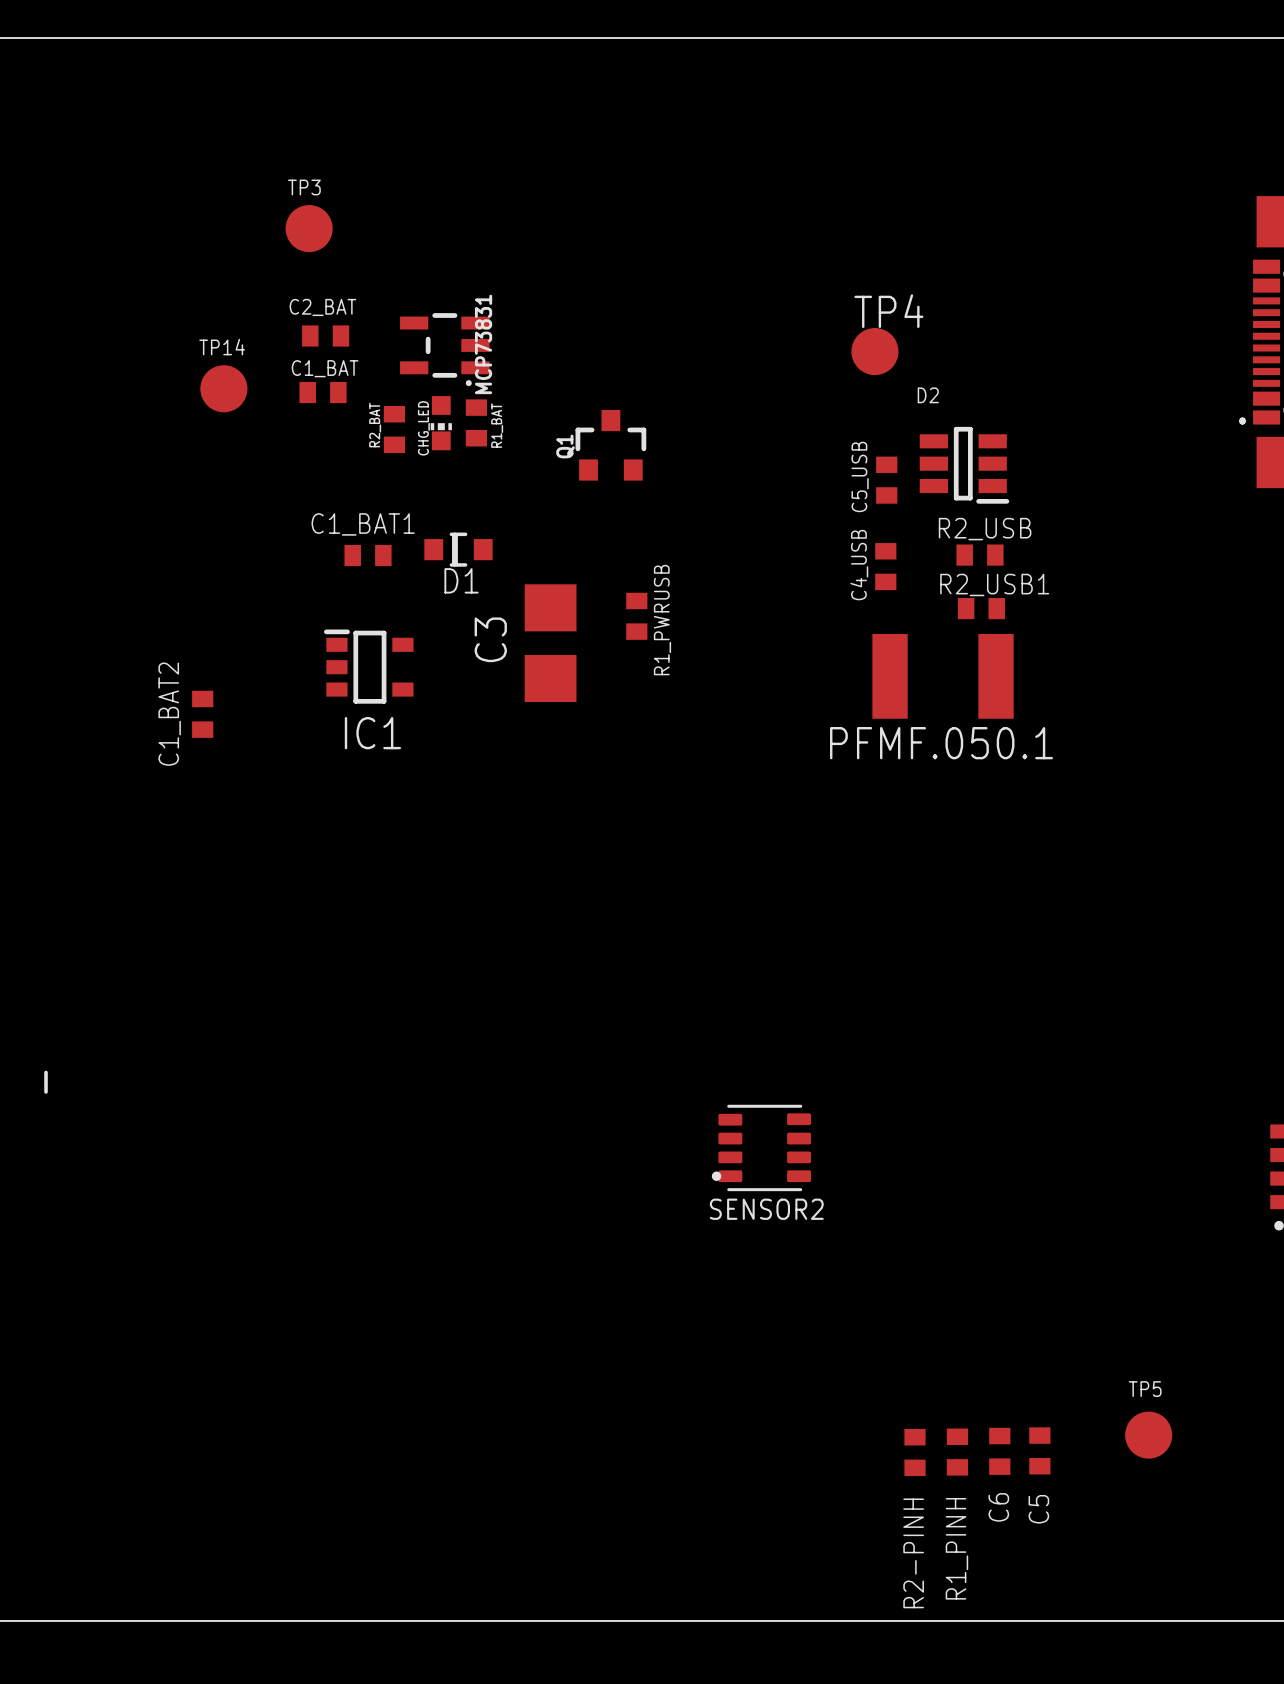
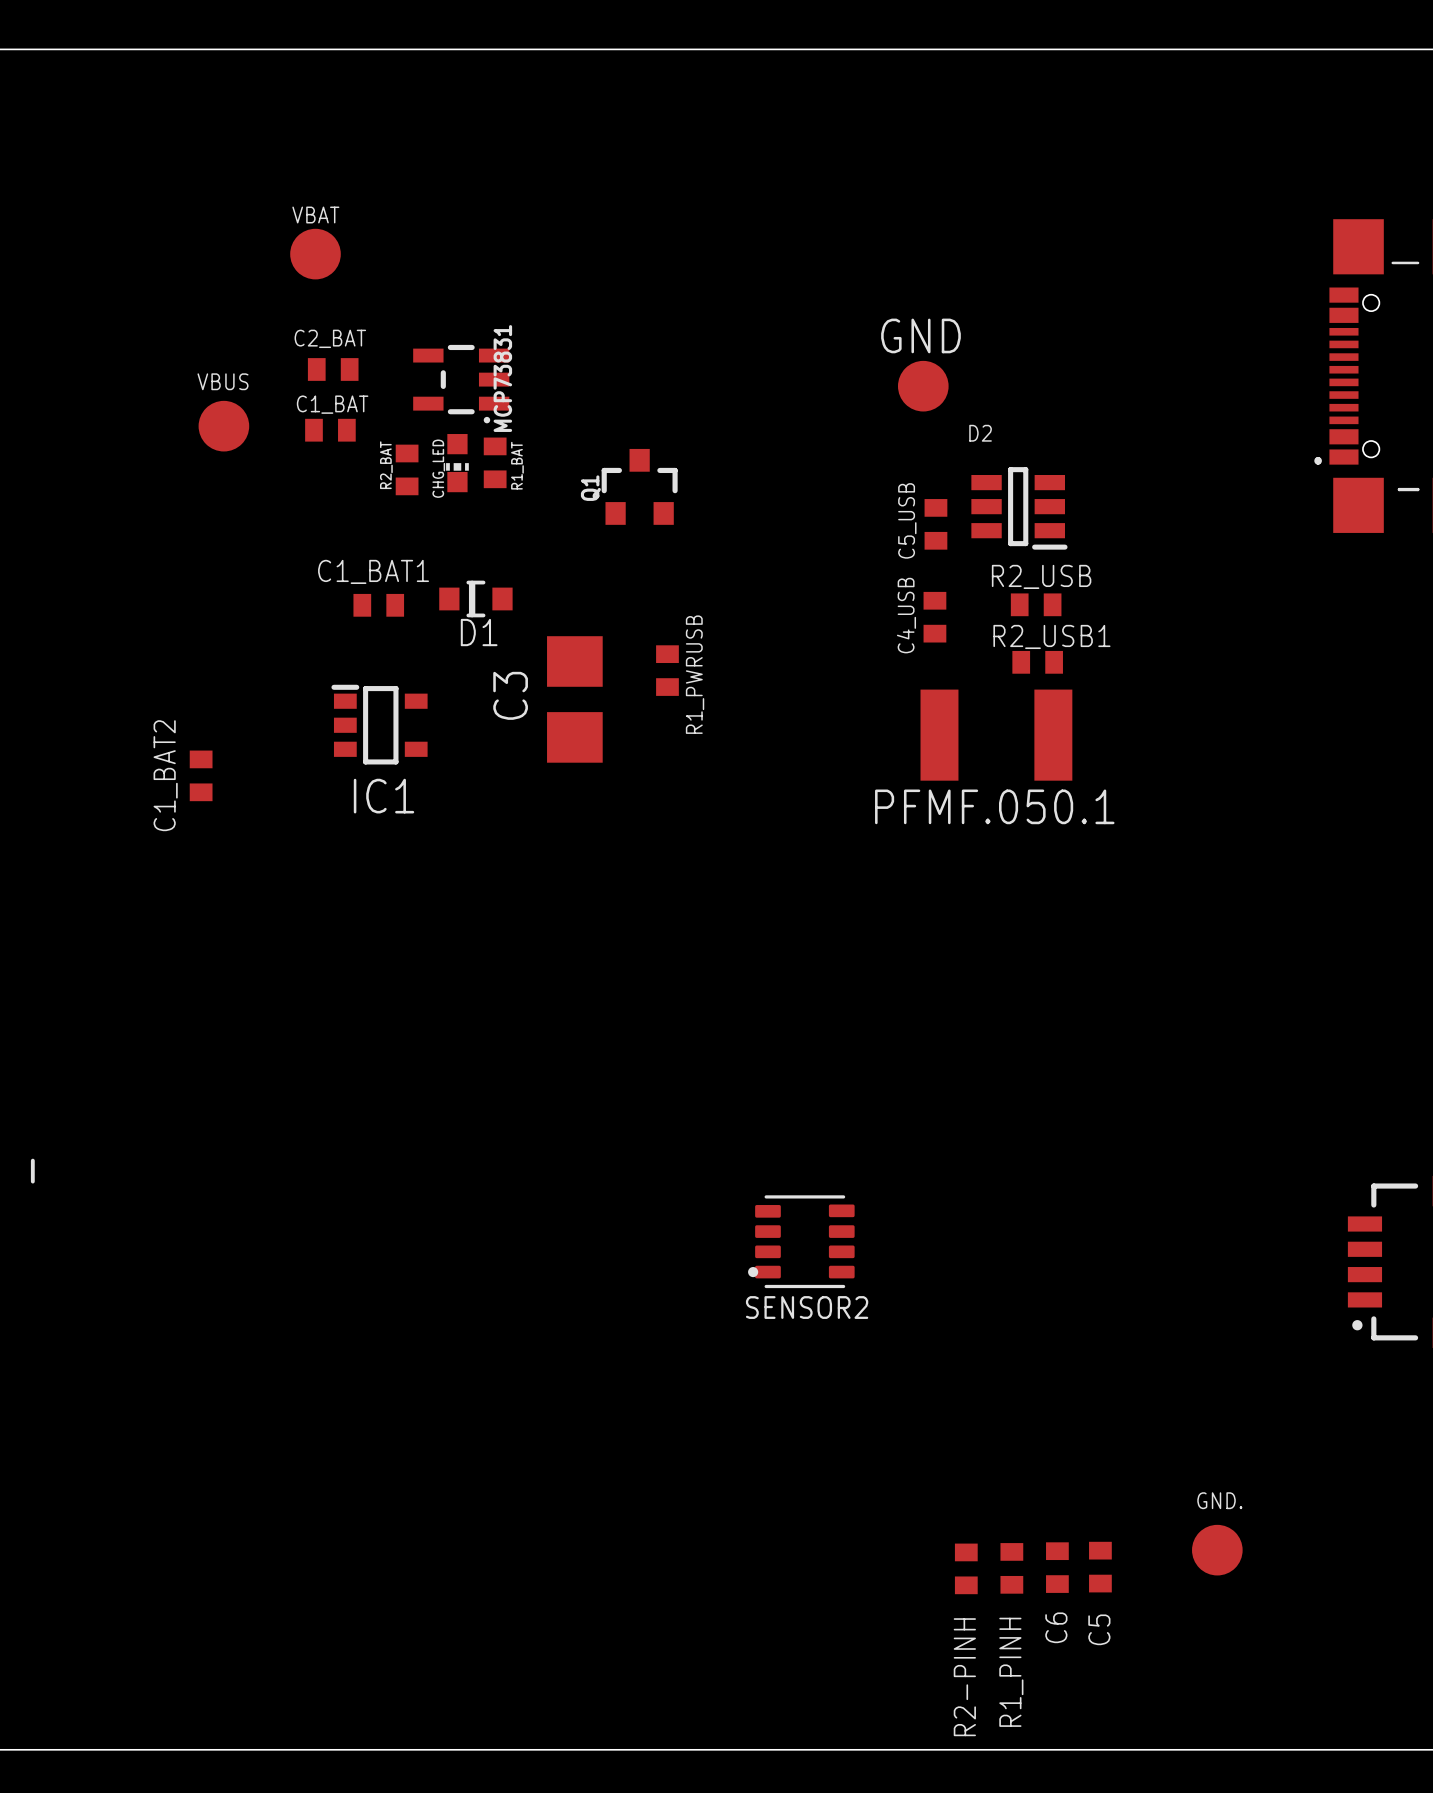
TP3 name: TP3 (304, 187) -> VBAT (315, 215)
TP4 name: TP4 (888, 311) -> GND (920, 335)
TP14 name: TP14 (222, 347) -> VBUS (222, 381)
TP5 name: TP5 (1145, 1389) -> GND. (1219, 1500)

